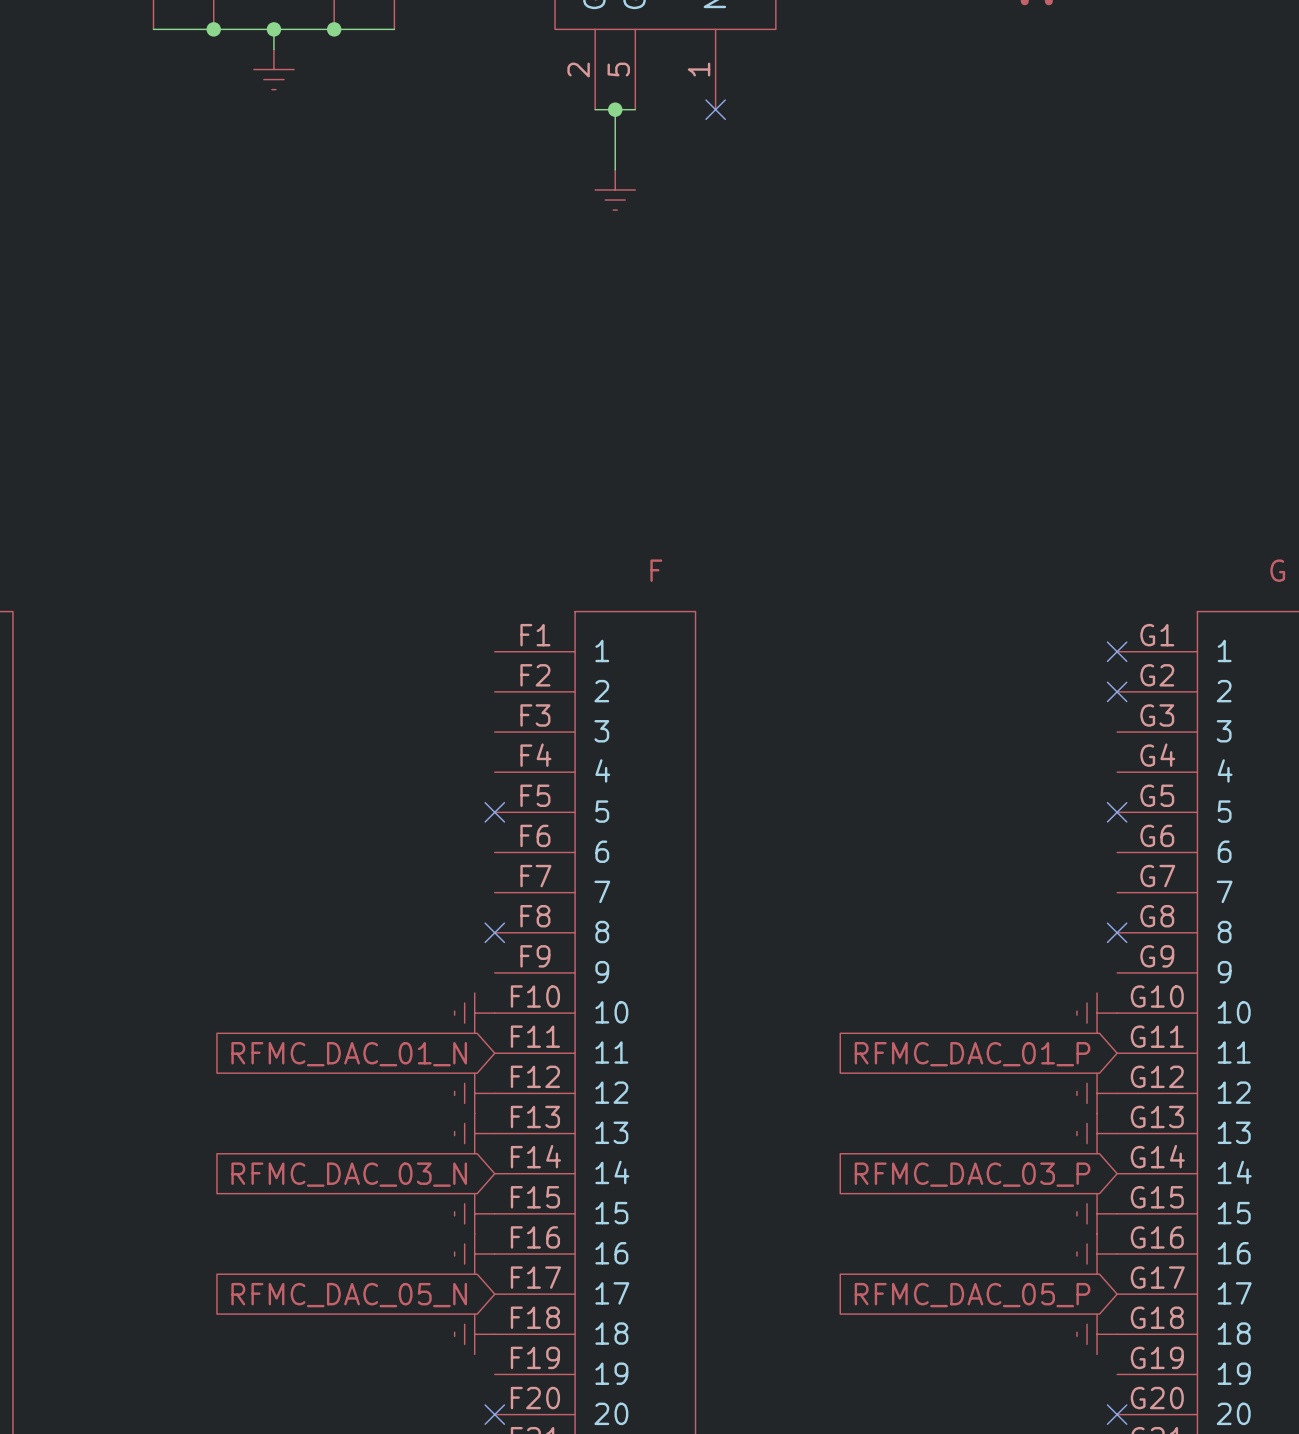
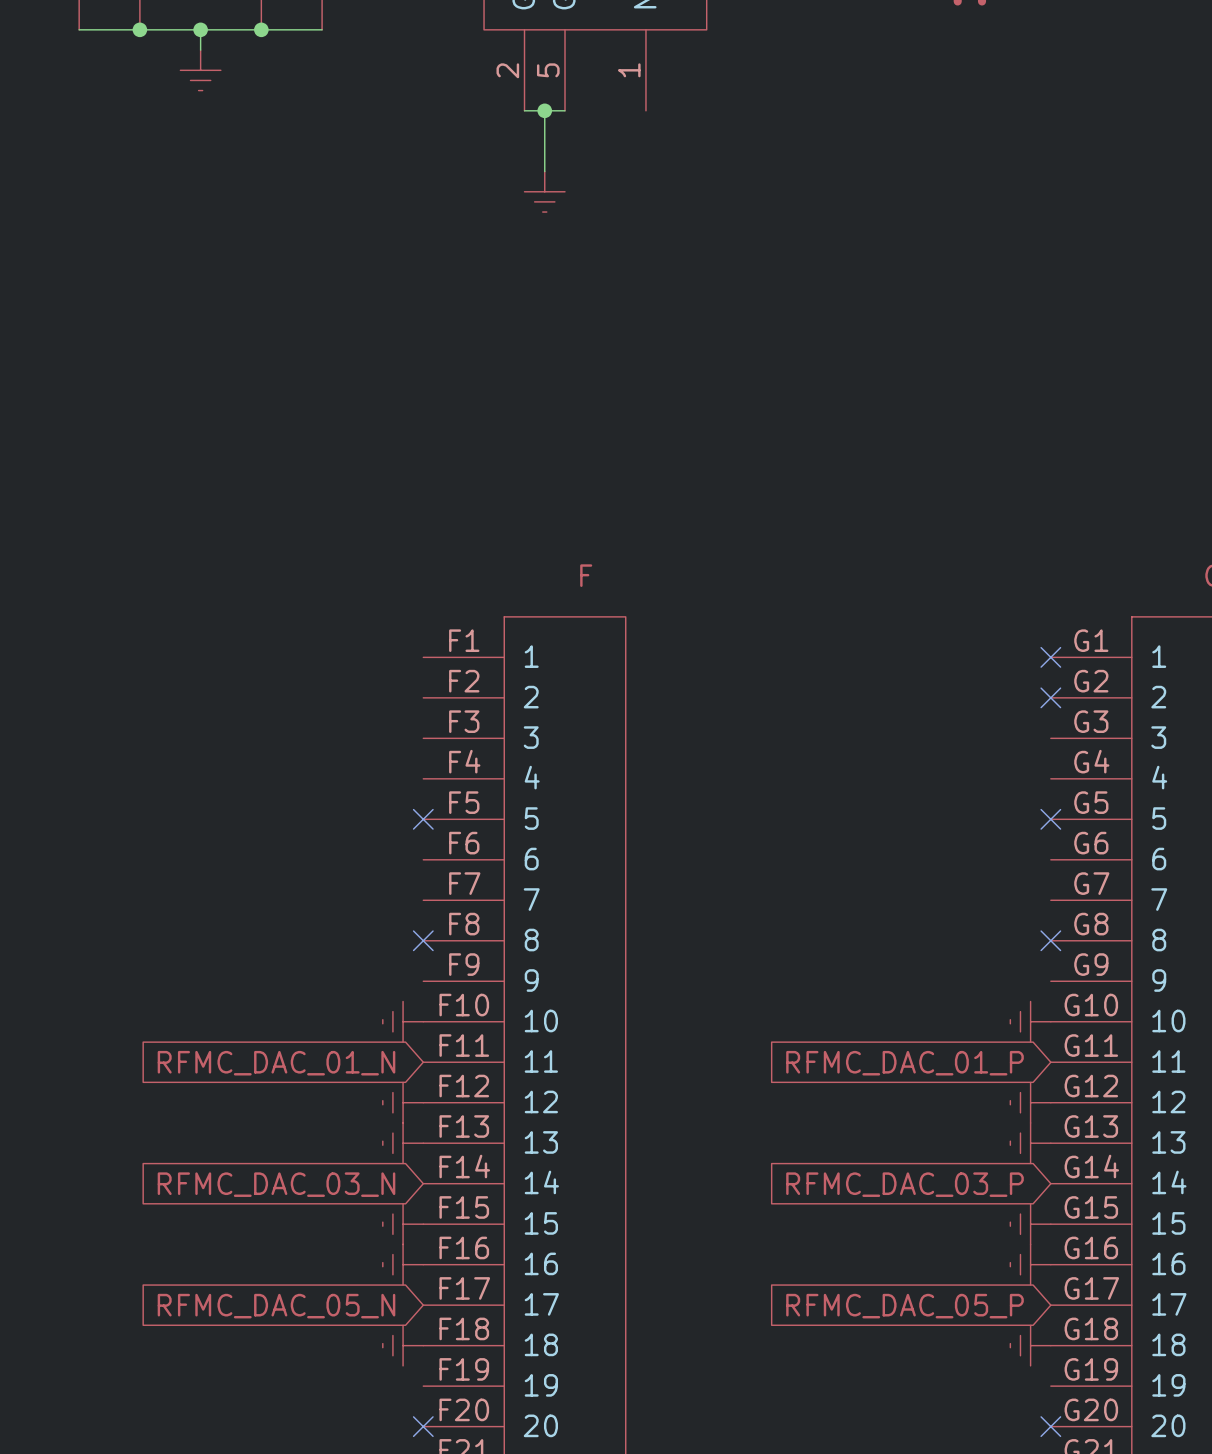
no-connect mark: (715, 109) -> none

